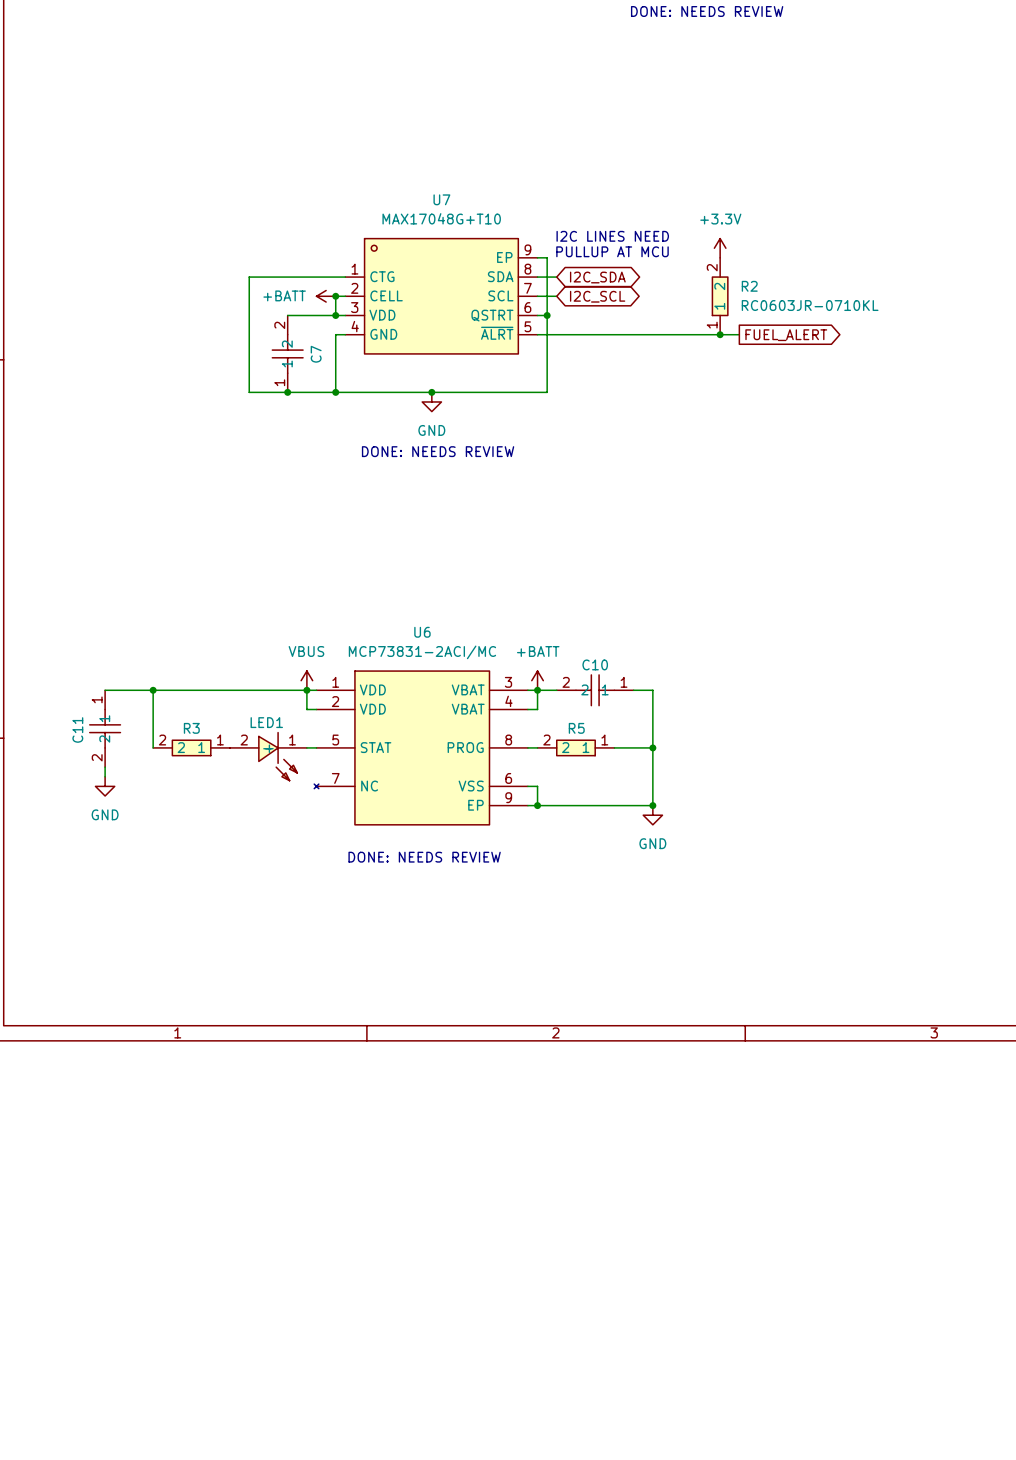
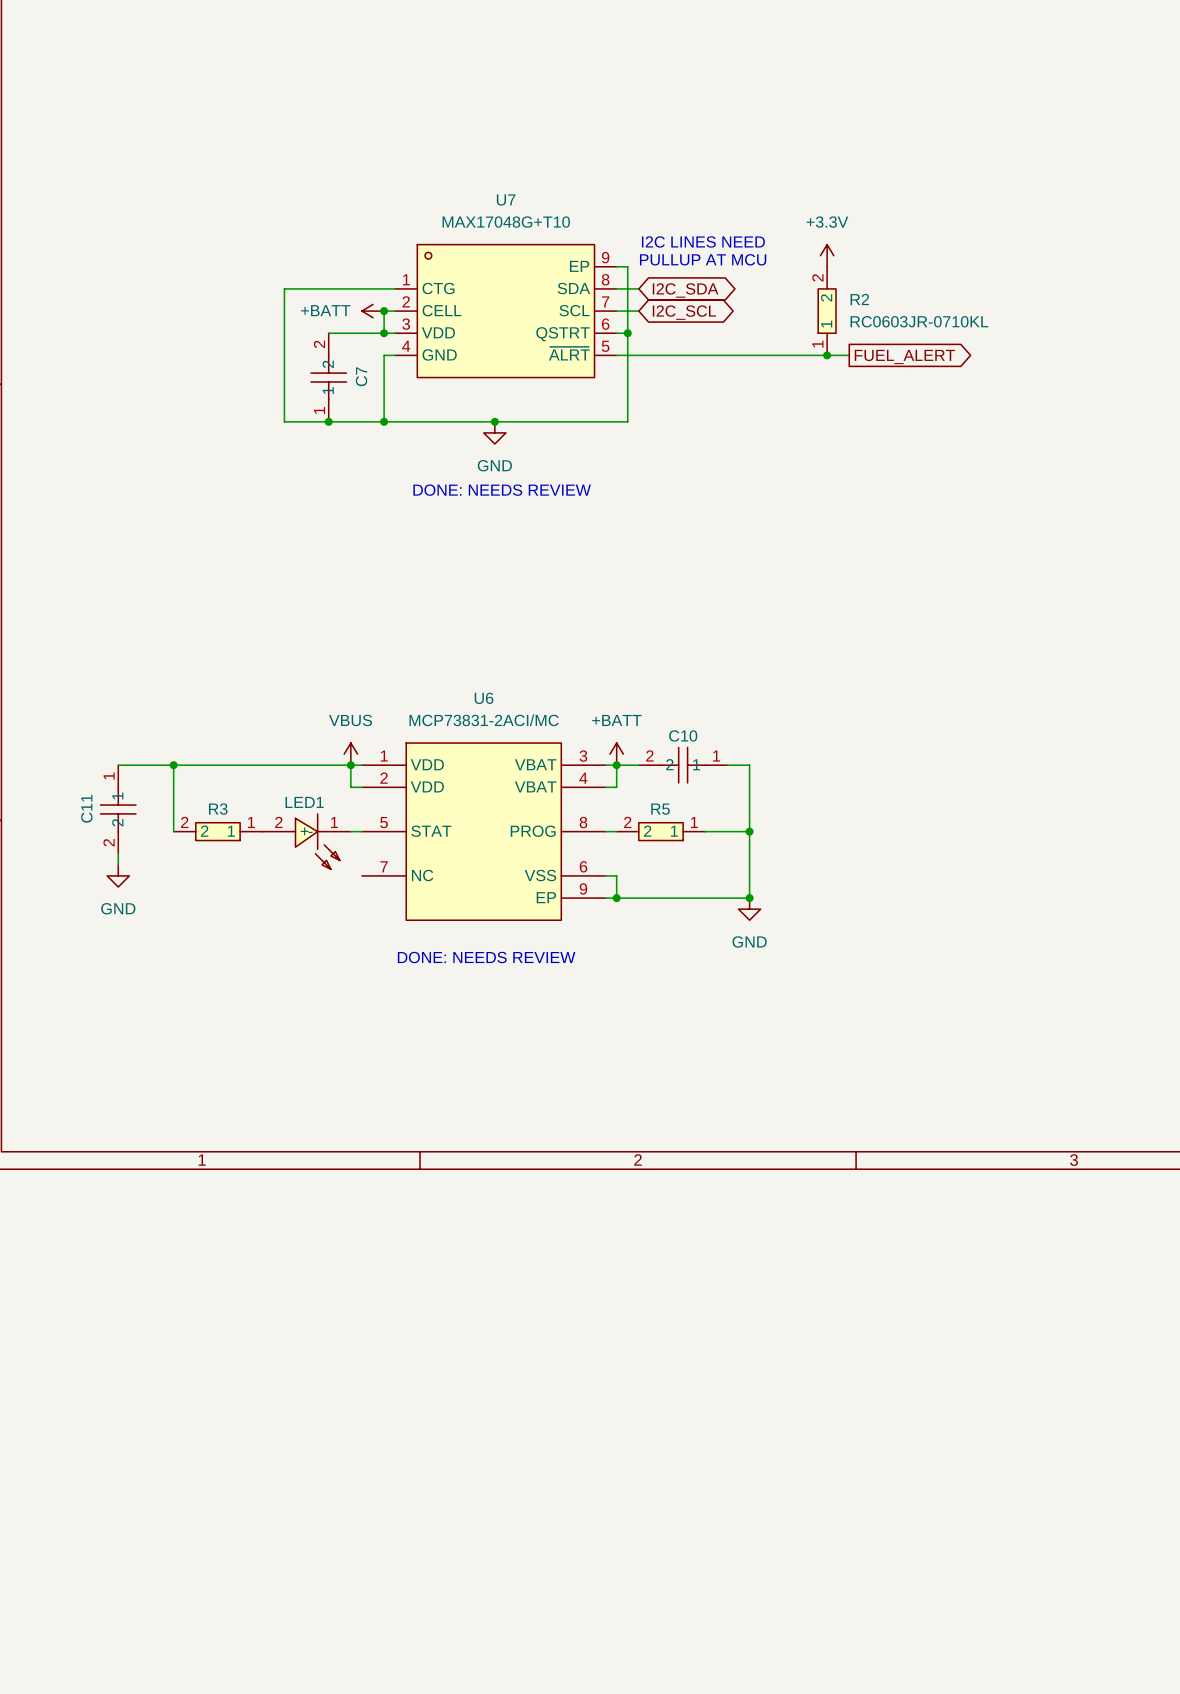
U6 symbol: [314, 671, 528, 825] -> [361, 743, 606, 921]

